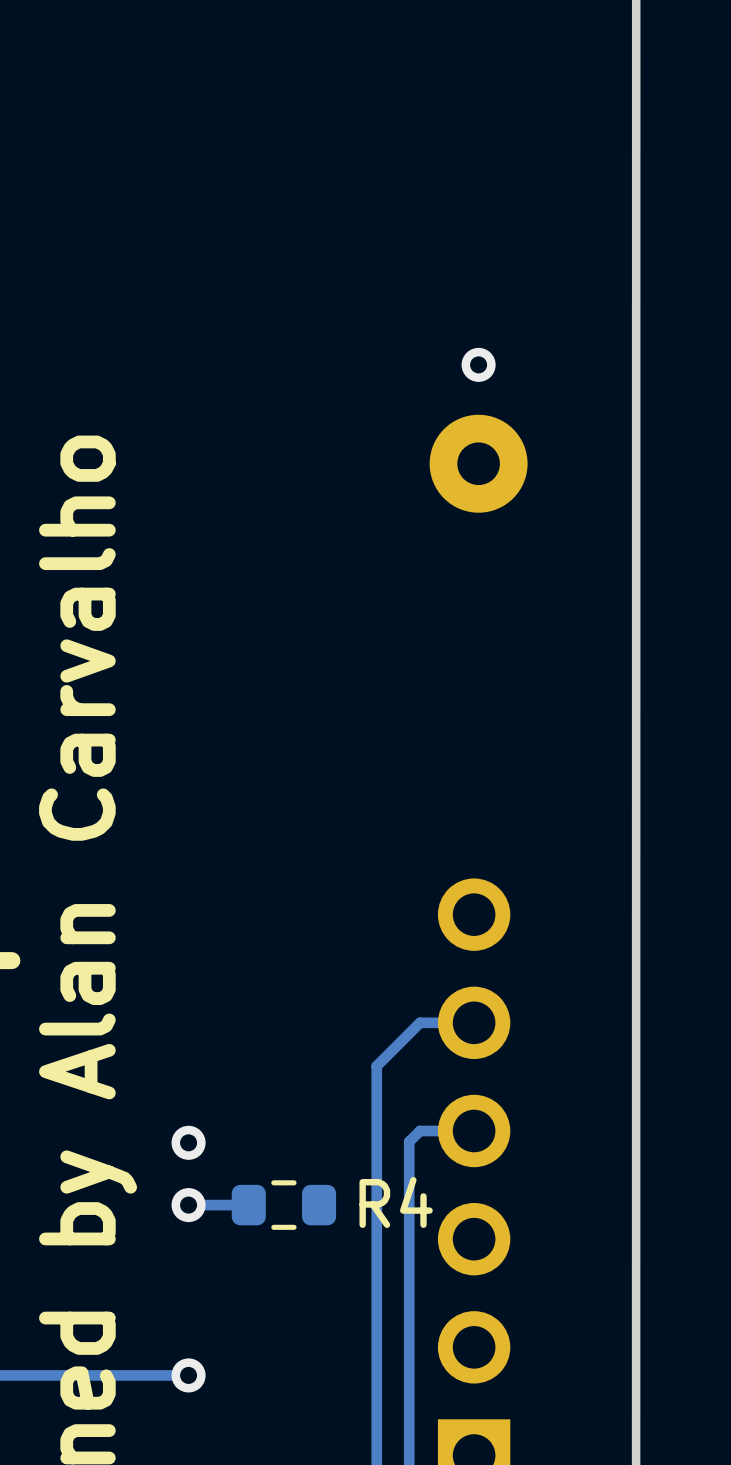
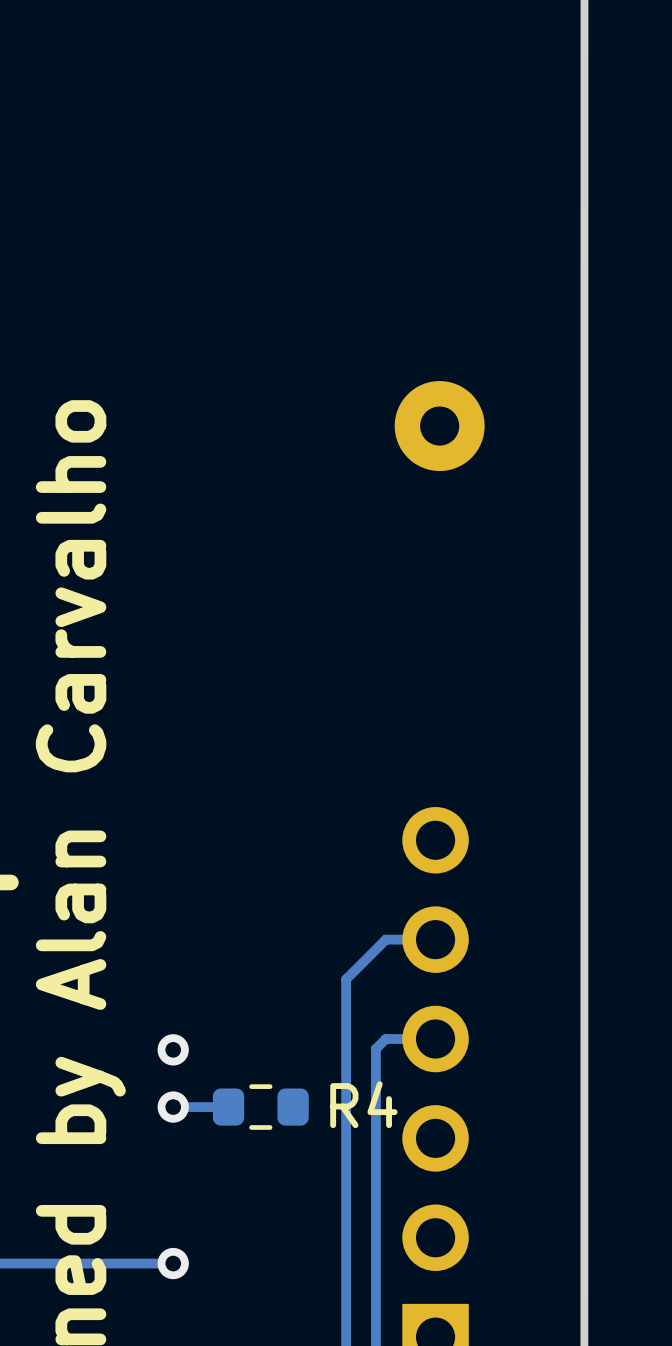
via: (478, 364) -> none

